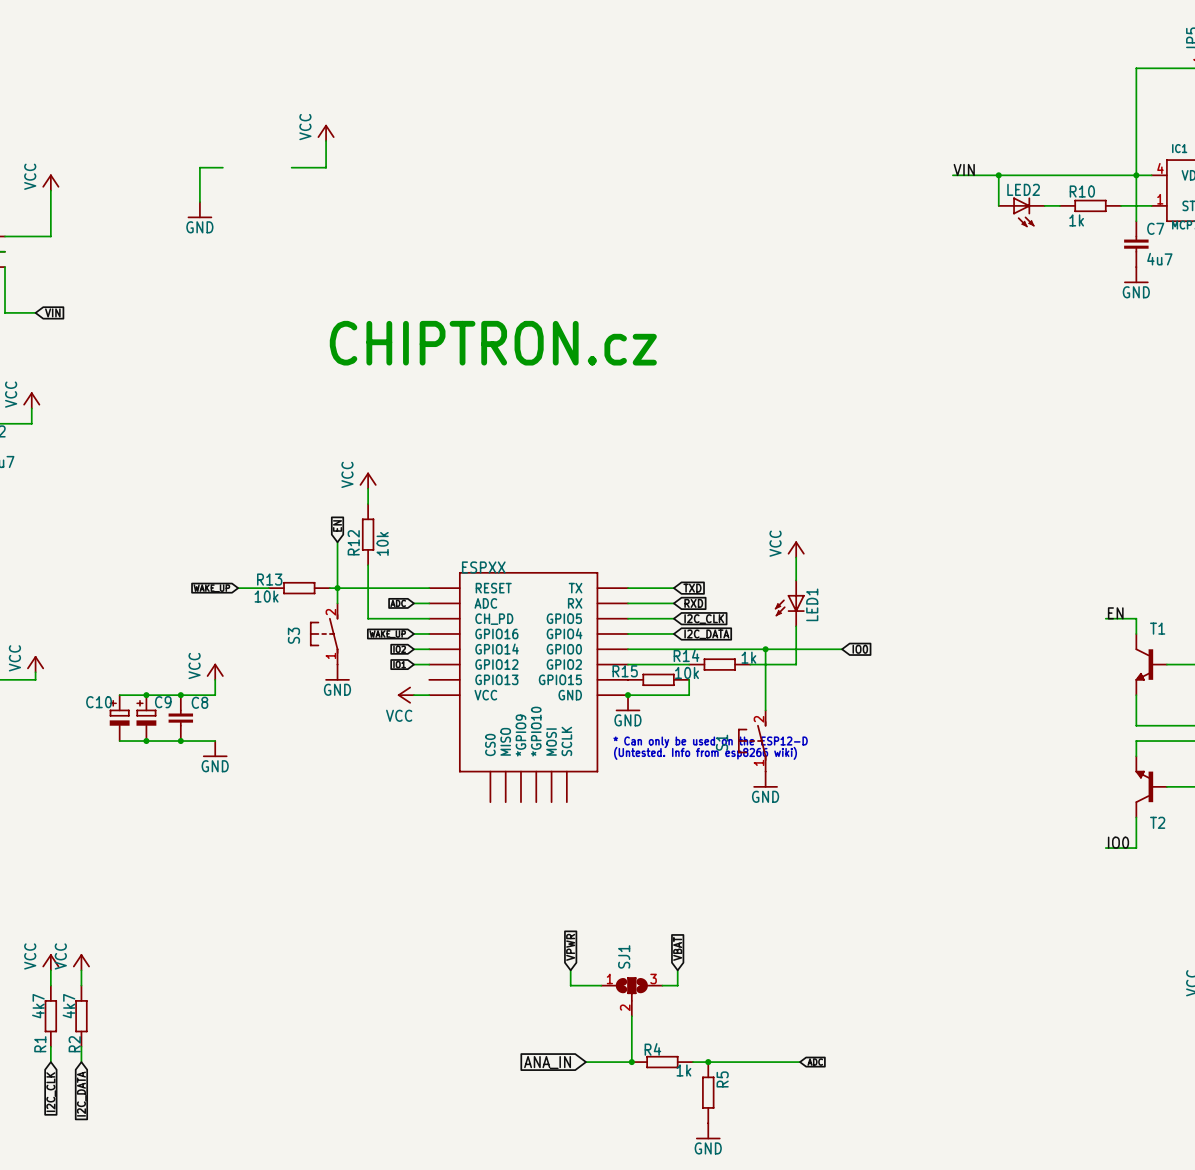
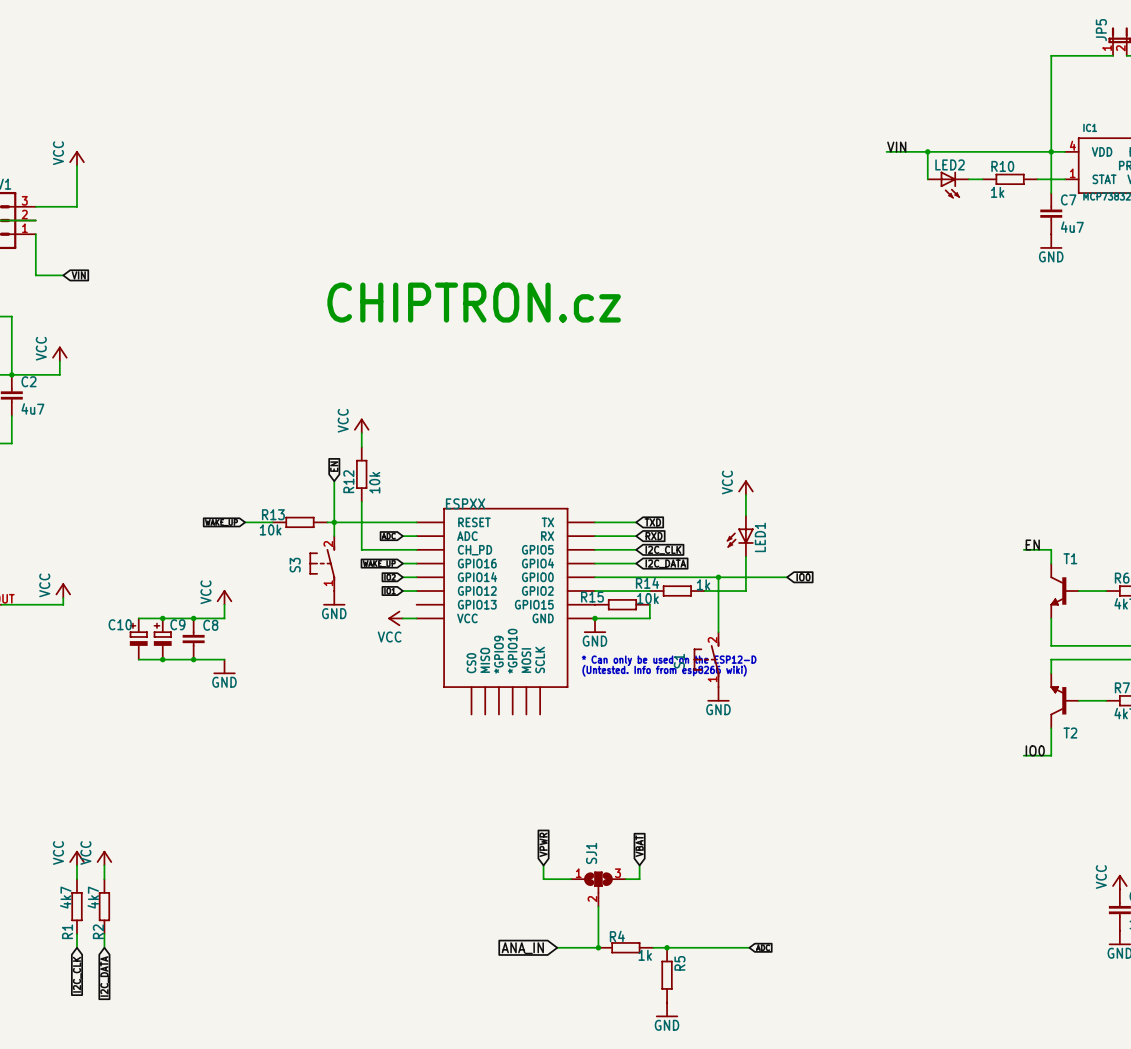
power symbol: VCC (326, 132) -> none
wire: (326, 140) (326, 167) (291, 167) -> none
wire: (222, 167) (199, 167) (199, 202) -> none
power symbol: GND (199, 210) -> none

